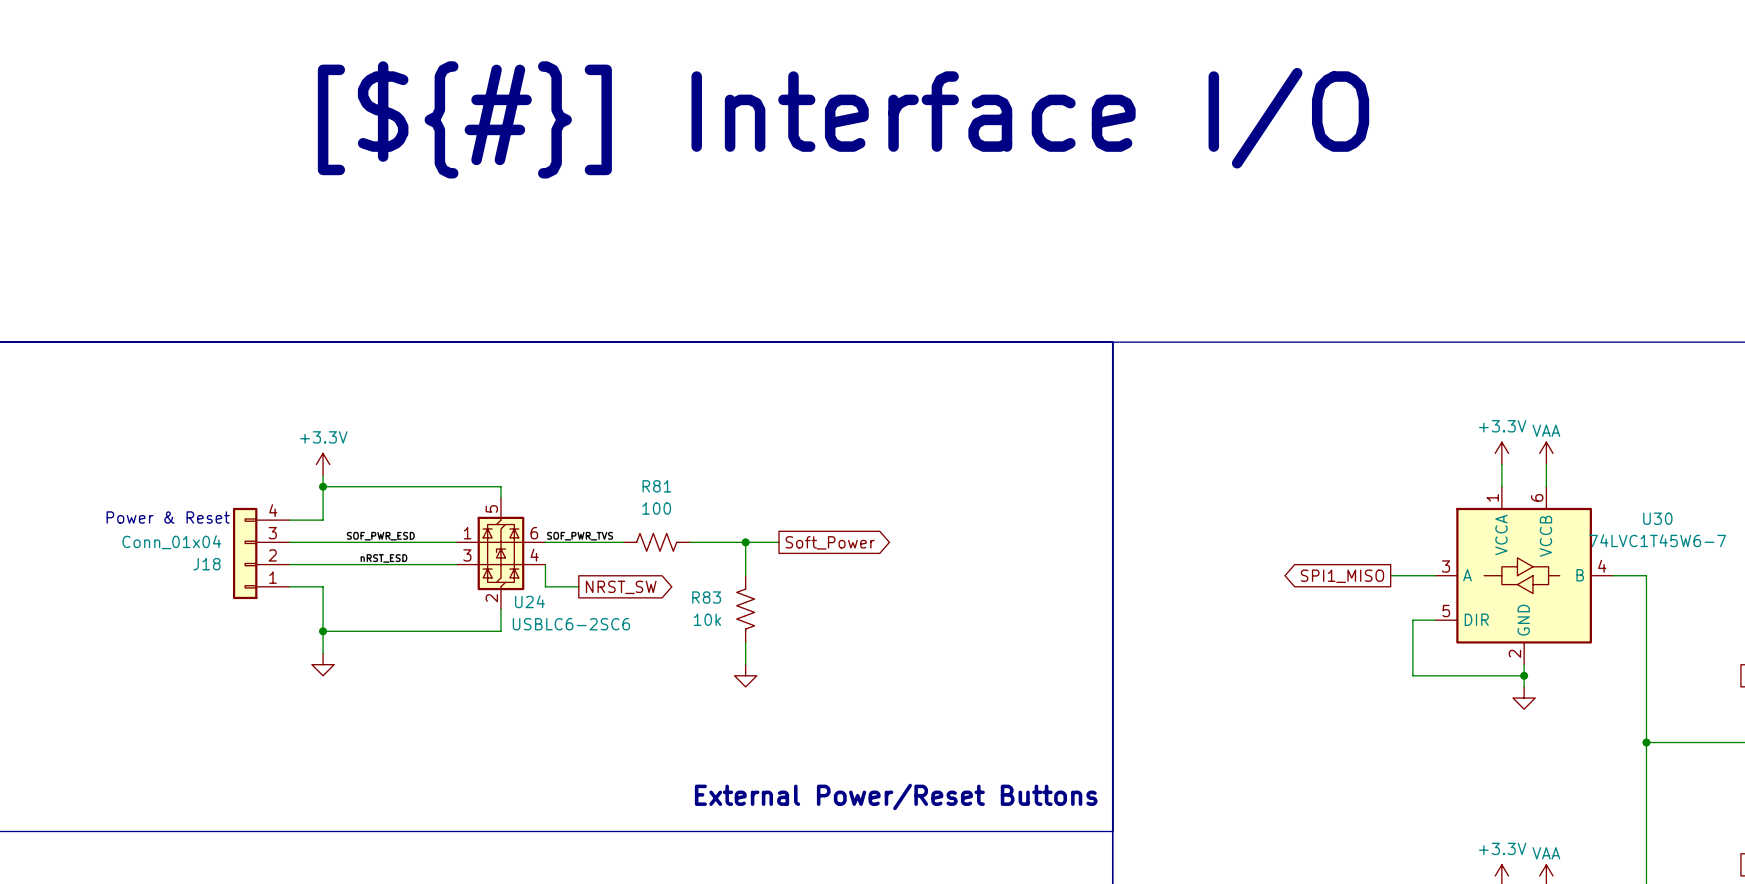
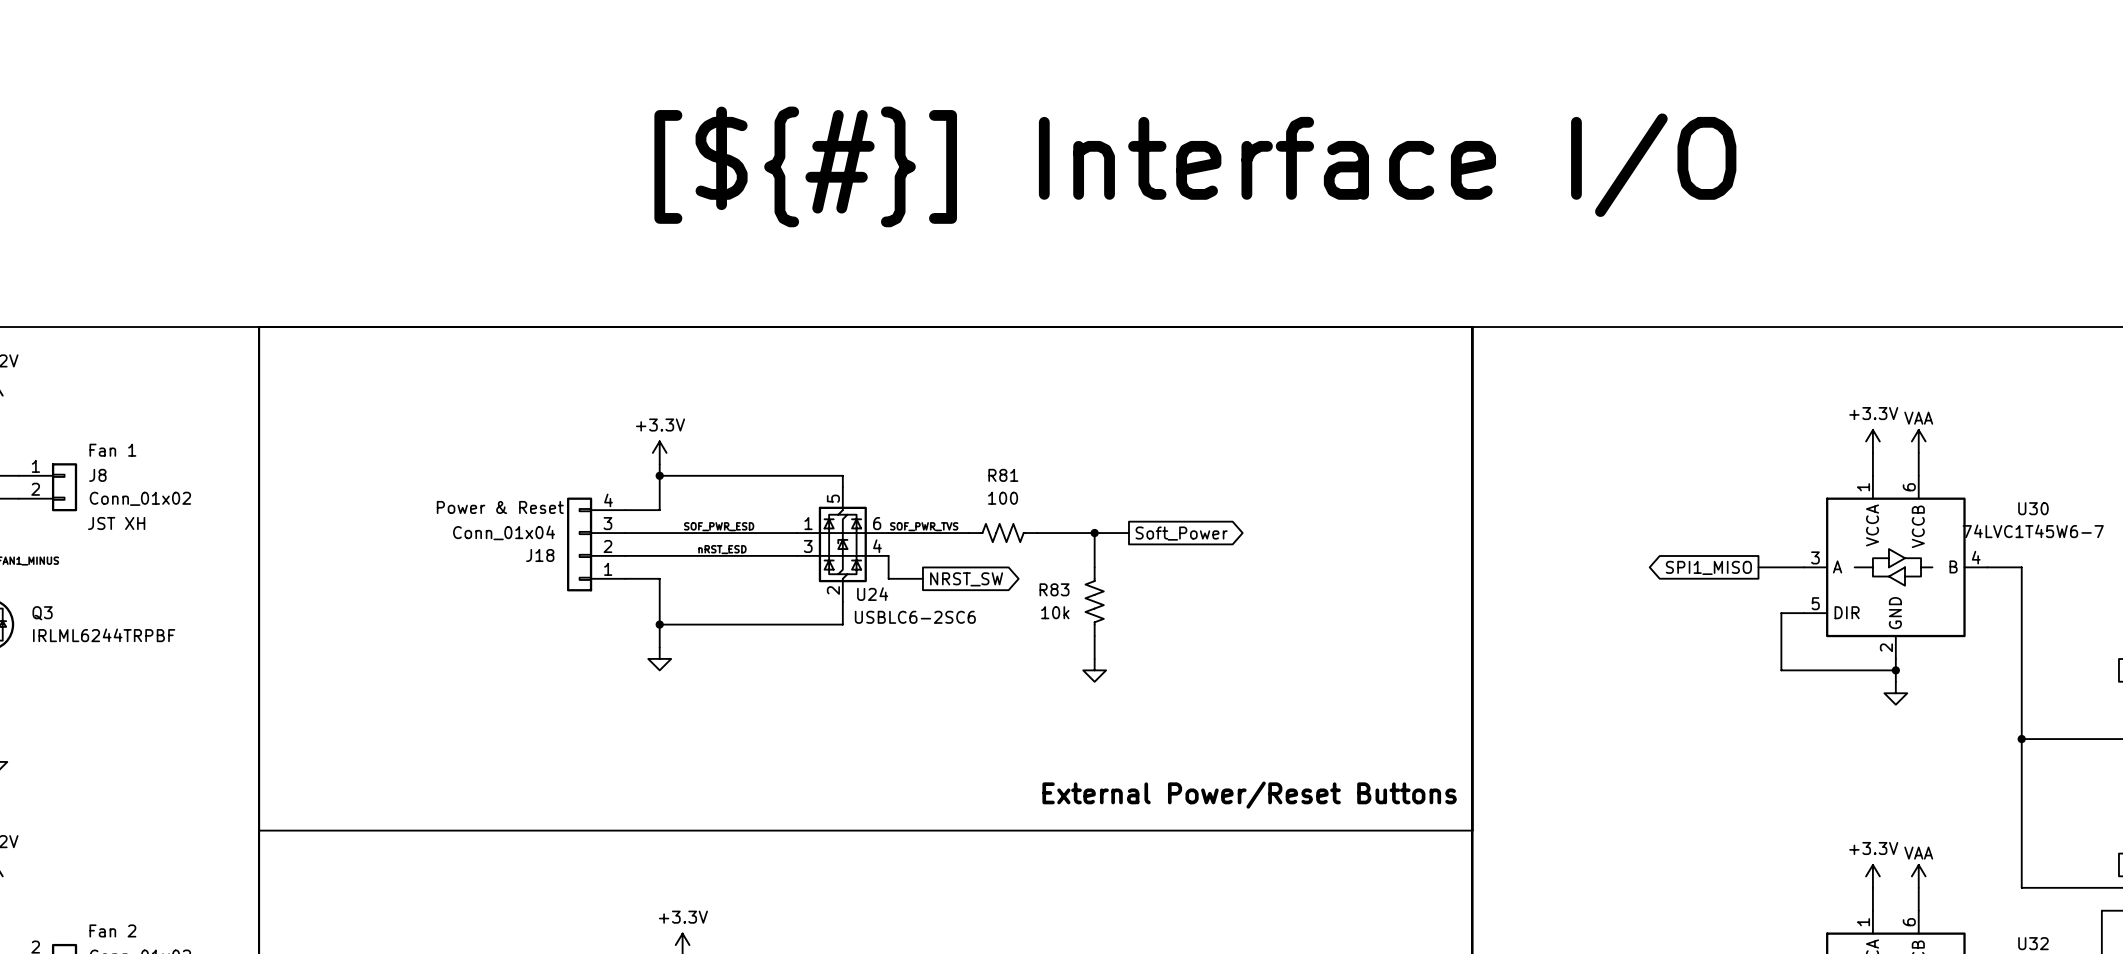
text position: [${#}] Interface I/O (843, 119) -> [${#}] Interface I/O (1195, 166)

